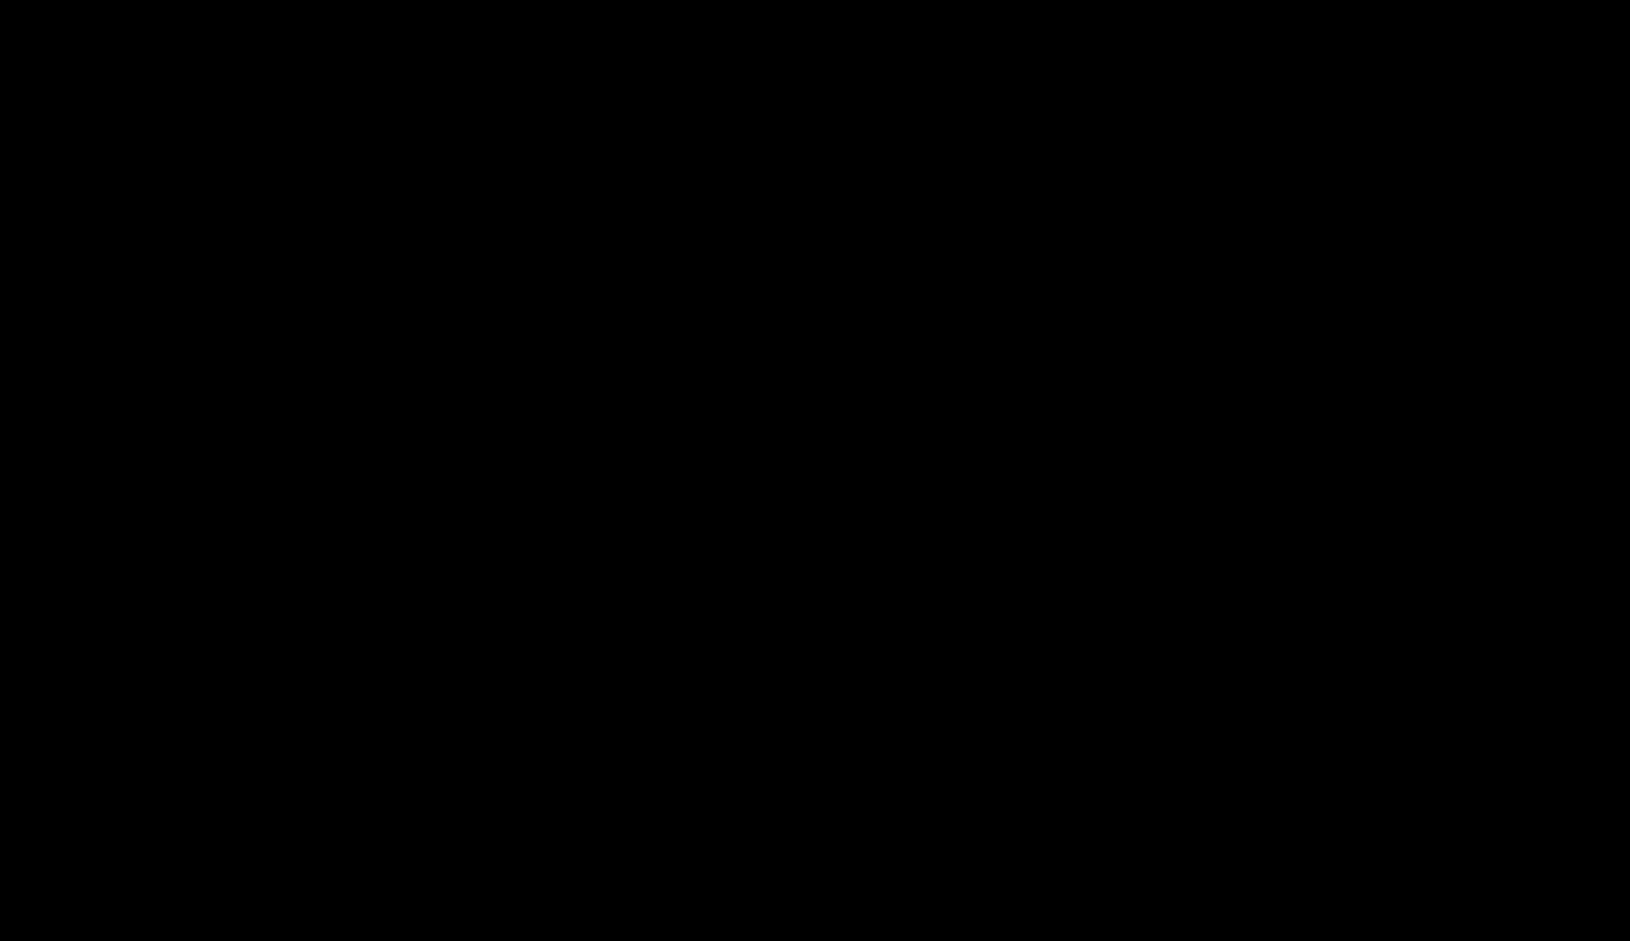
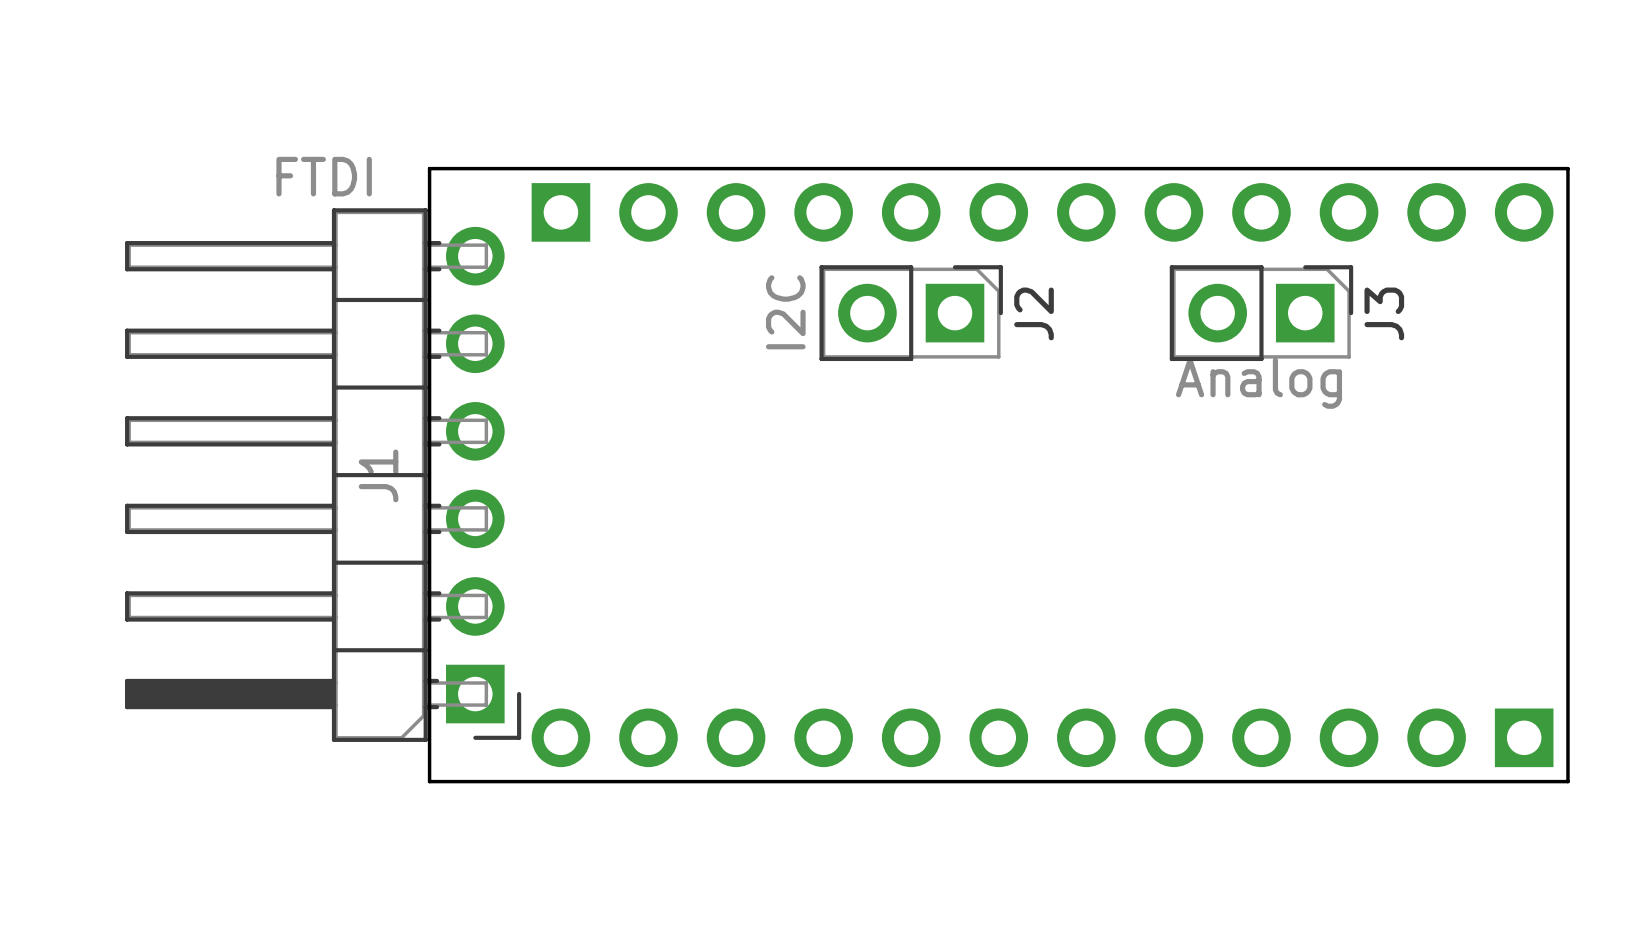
board edge: none -> (429, 168) (1567, 168) (1567, 781) (429, 781) (429, 168)
part: none -> (1042, 212)
J2: none -> I2C (911, 313)
J3: none -> Analog (1261, 313)
J1: none -> FTDI (323, 475)
part: none -> (1042, 737)

